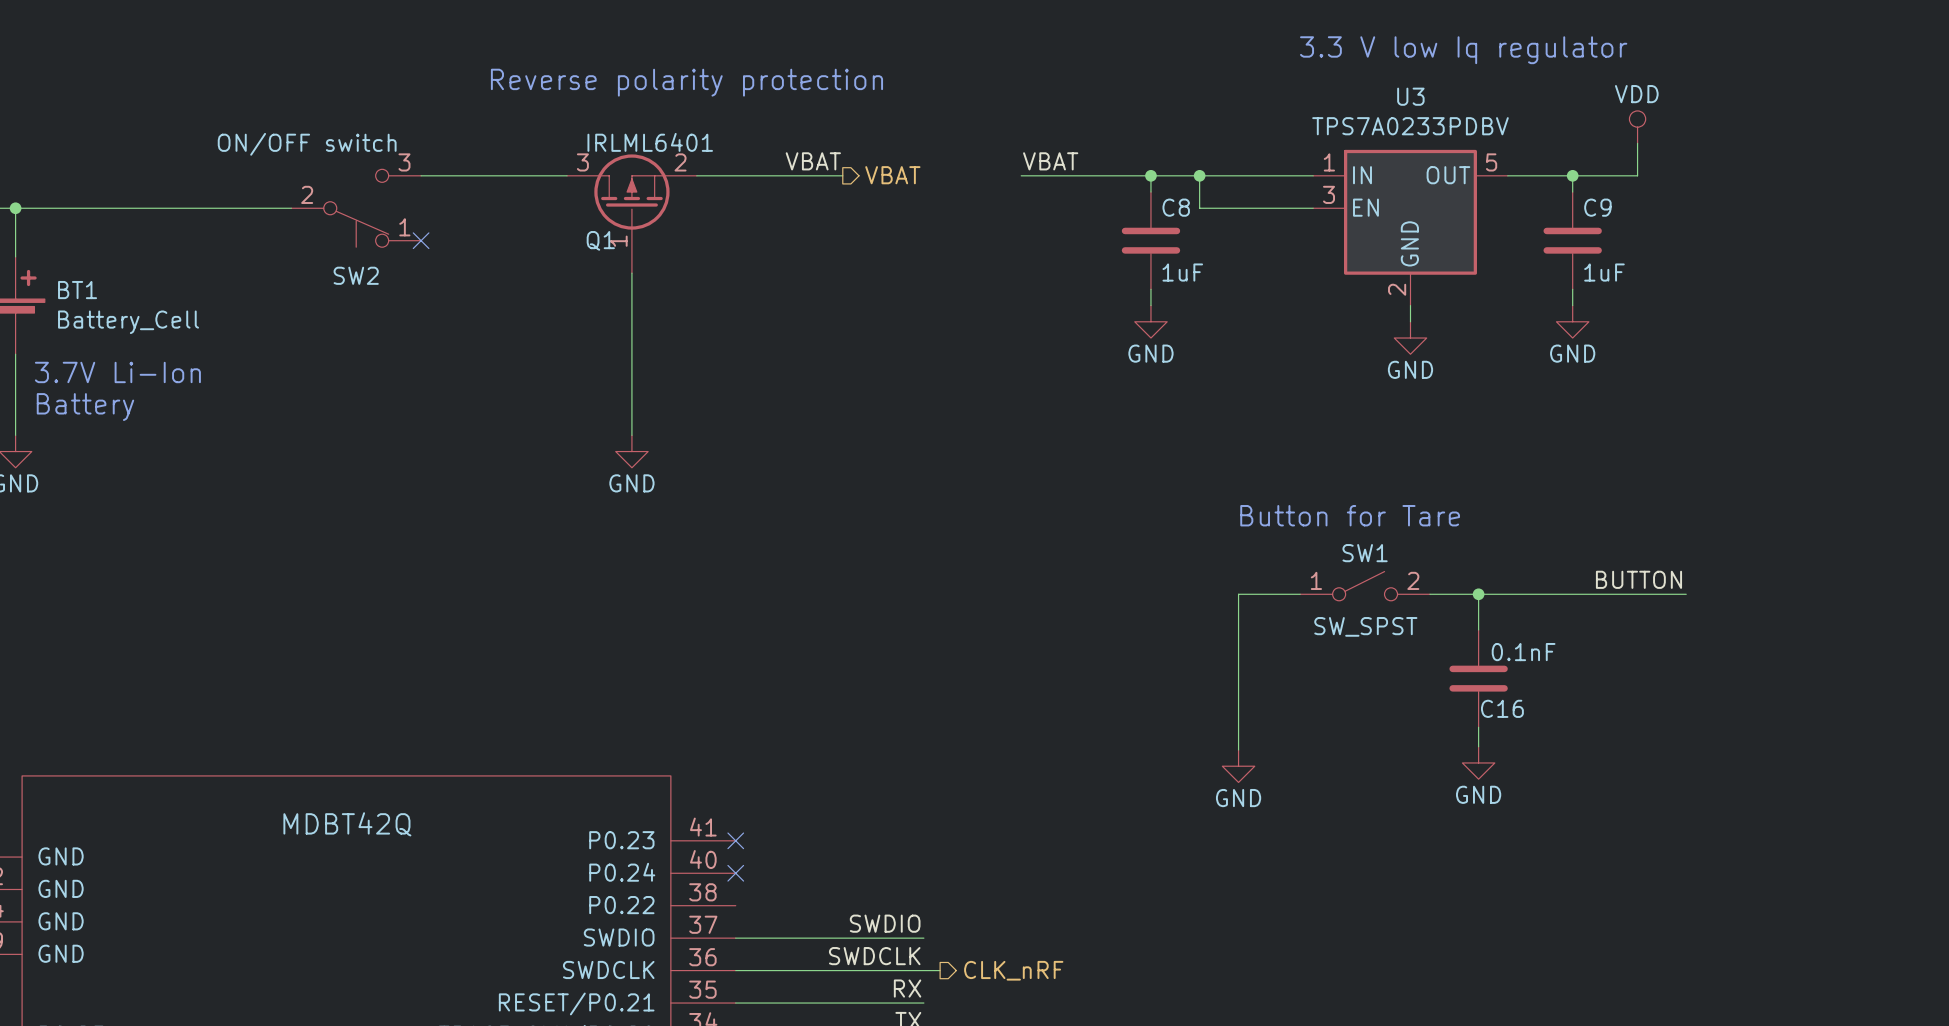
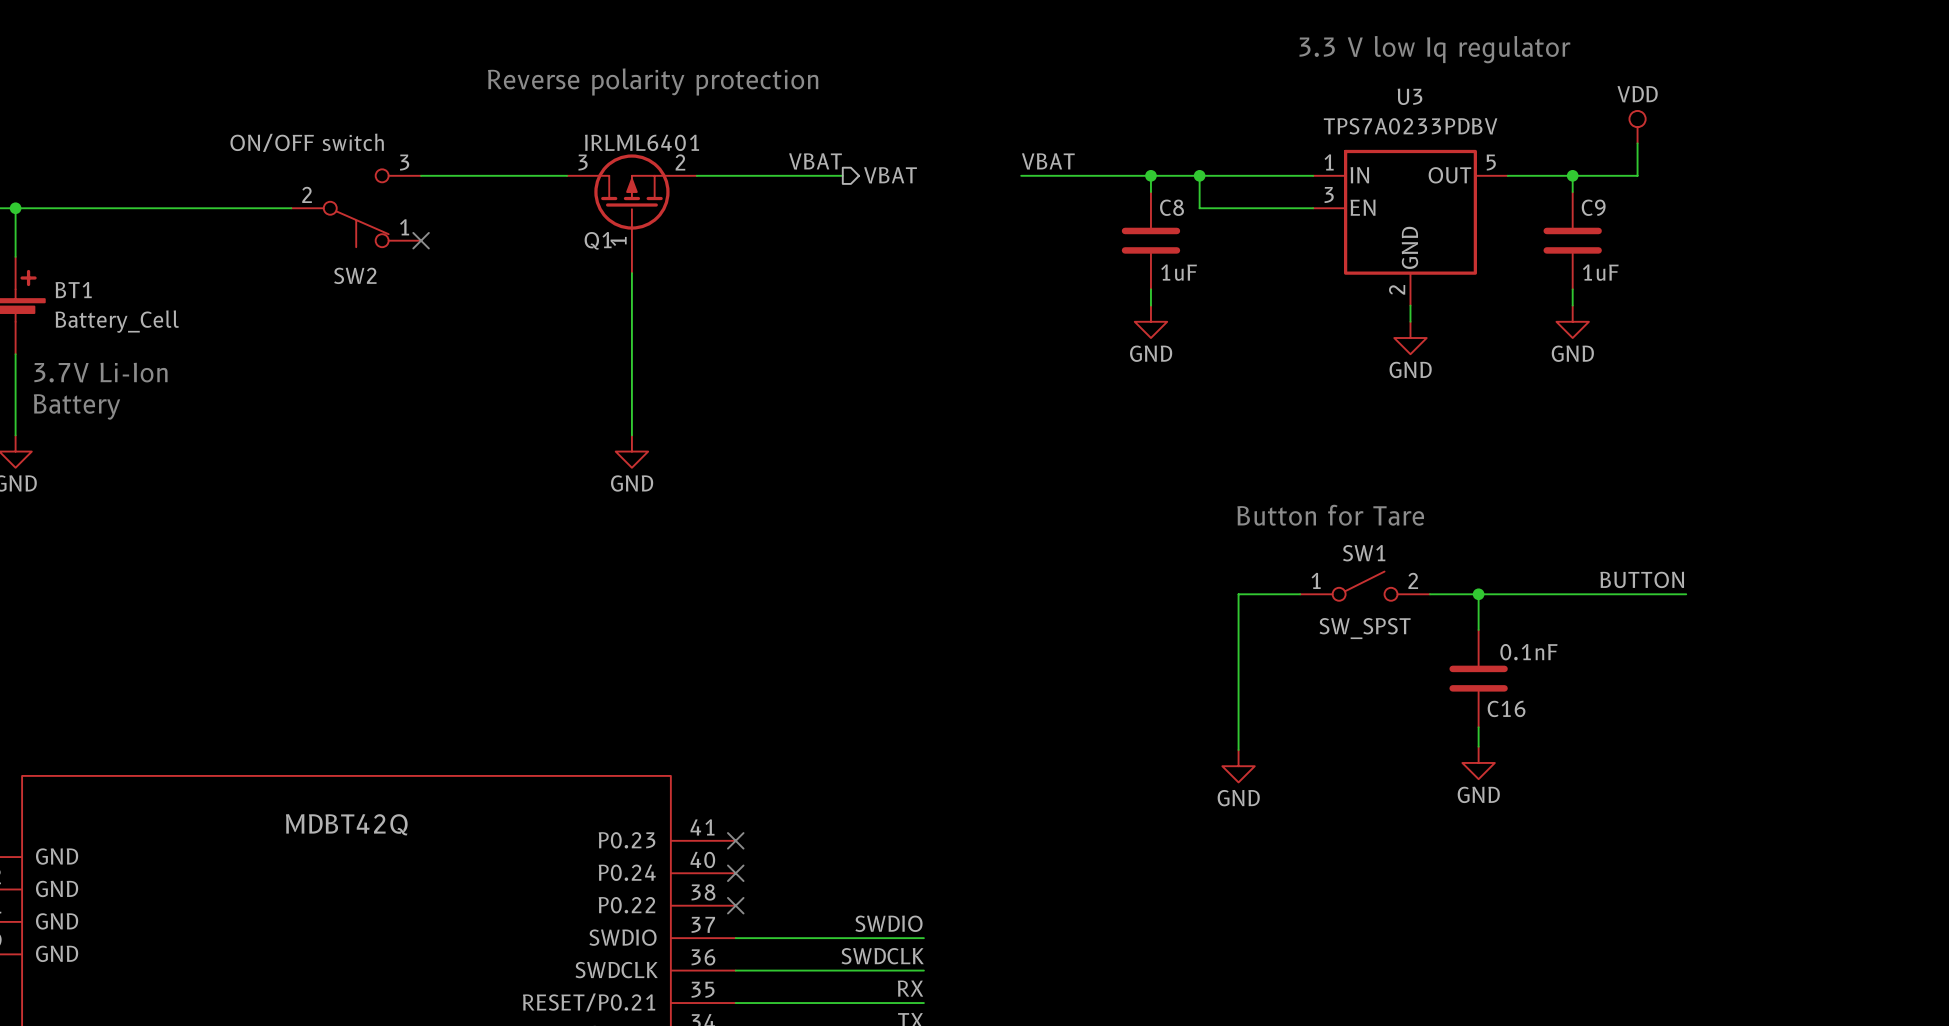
no-connect mark: none -> (735, 905)
wire: (923, 970) (940, 970) -> none
hierarchical label: CLK_nRF (1013, 970) -> none

